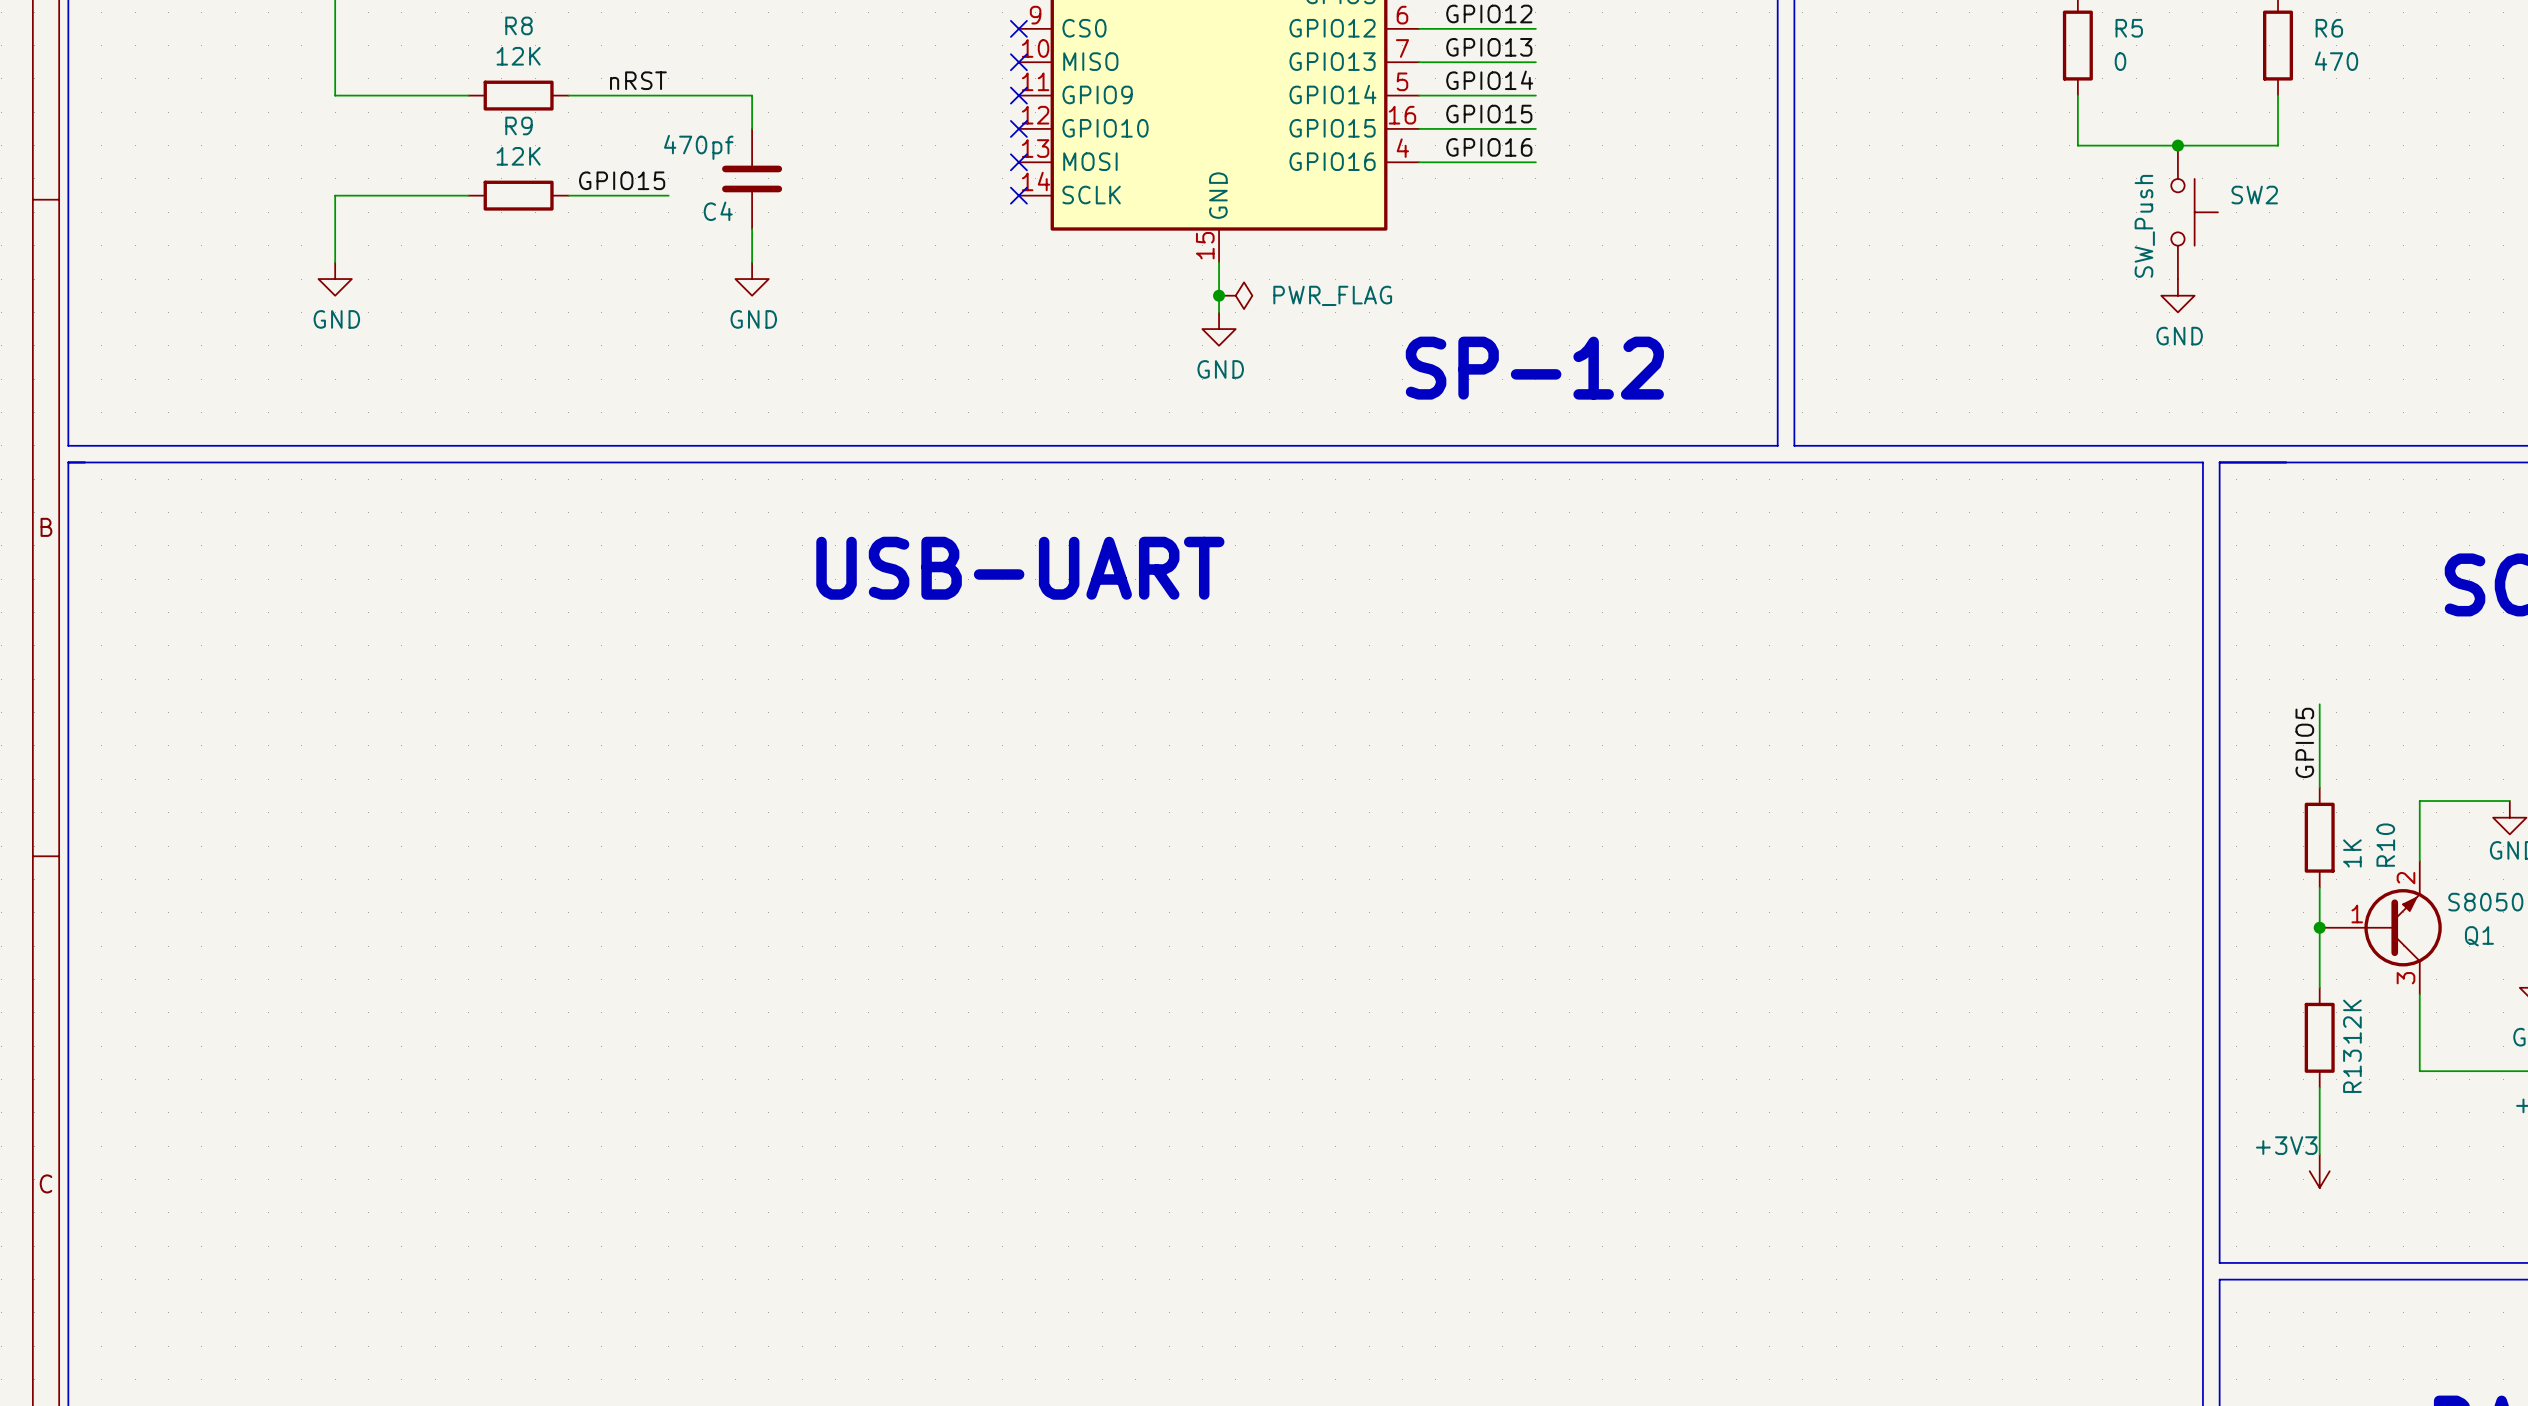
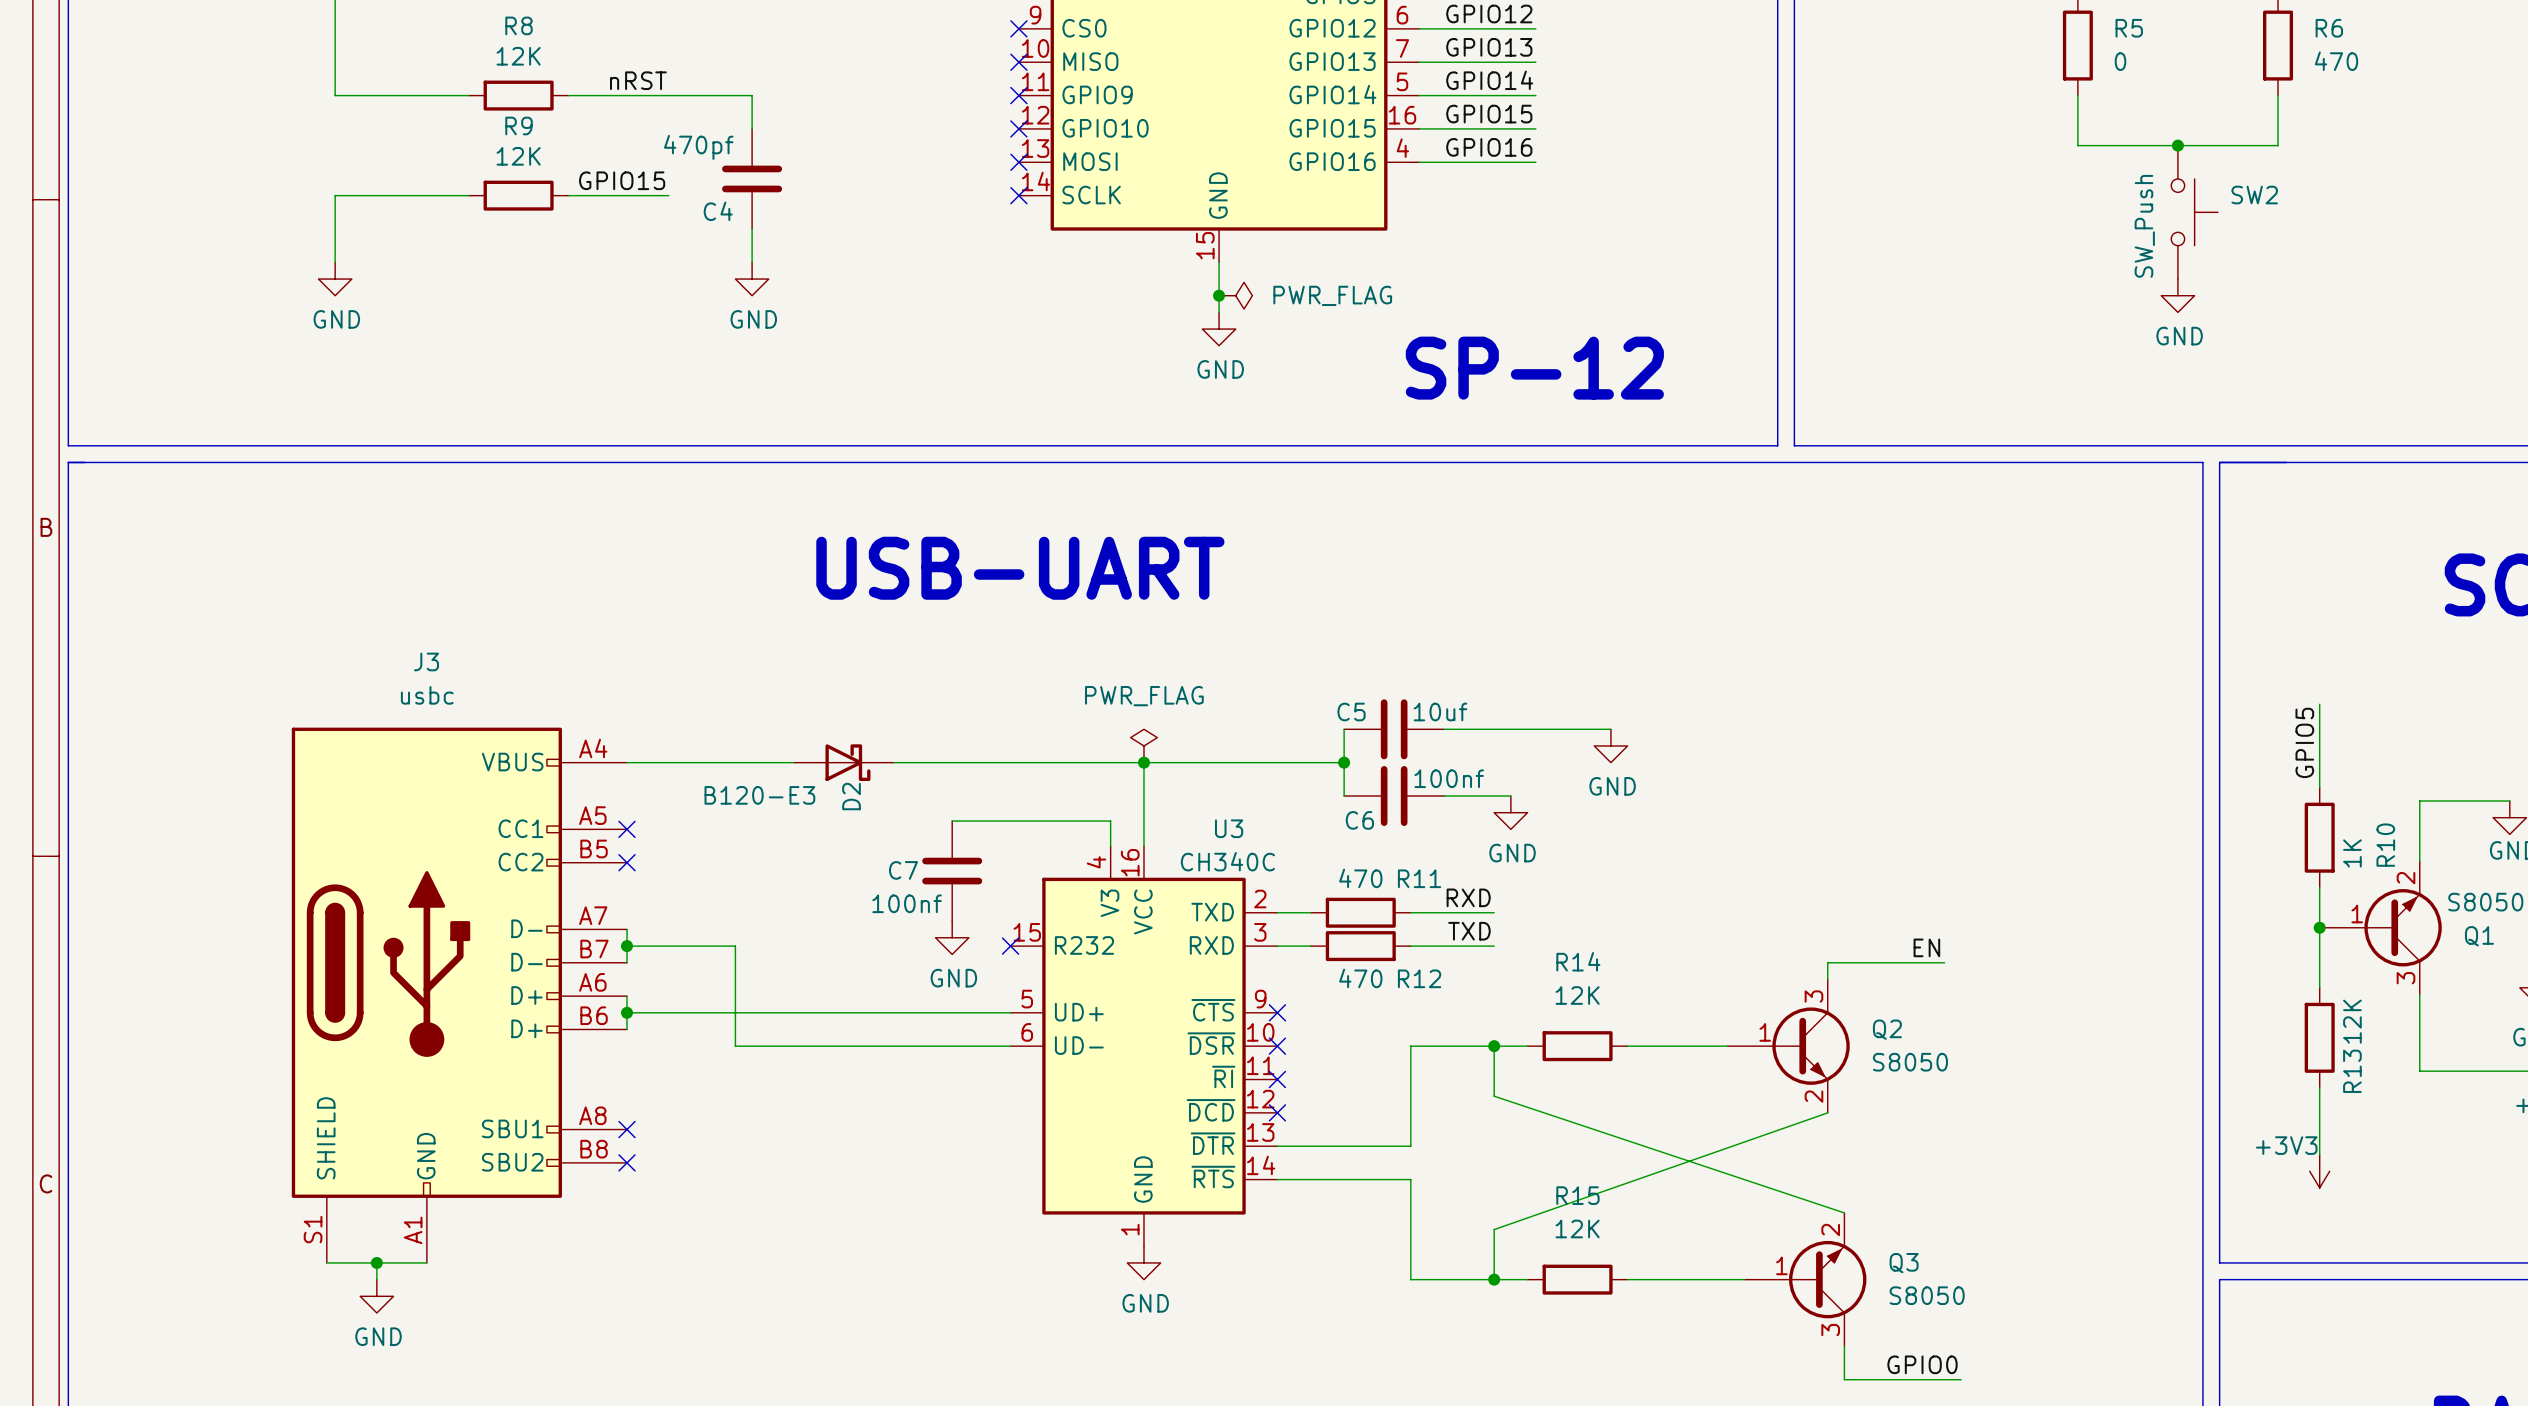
wire: none -> (1344, 729) (1344, 796)
C5: none -> 10uf (1394, 729)
wire: none -> (1444, 729) (1610, 729)
power symbol: none -> PWR_FLAG (1143, 745)
power symbol: none -> GND (1610, 745)
wire: none -> (627, 762) (793, 762)
D2: none -> B120-E3 (843, 762)
wire: none -> (893, 762) (1344, 762)
wire: none -> (1143, 762) (1143, 846)
junction: none -> (1143, 762)
junction: none -> (1344, 762)
C6: none -> 100nf (1394, 796)
wire: none -> (1444, 796) (1510, 796)
power symbol: none -> GND (1510, 812)
wire: none -> (952, 821) (1110, 821) (1110, 846)
no-connect mark: none -> (627, 829)
no-connect mark: none -> (627, 862)
C7: none -> 100nf (952, 871)
label: none -> RXD (1468, 897)
wire: none -> (1277, 912) (1310, 912)
R11: none -> 470 (1360, 912)
wire: none -> (1410, 912) (1494, 912)
wire: none -> (627, 929) (627, 962)
label: none -> TXD (1469, 931)
power symbol: none -> GND (952, 937)
wire: none -> (627, 946) (735, 946) (735, 1046) (1010, 1046)
junction: none -> (627, 946)
no-connect mark: none -> (1010, 946)
wire: none -> (1277, 946) (1310, 946)
R12: none -> 470 (1360, 946)
wire: none -> (1410, 946) (1494, 946)
label: none -> EN (1926, 947)
wire: none -> (1944, 962) (1827, 962) (1827, 979)
J3: none -> usbc (459, 995)
wire: none -> (627, 996) (627, 1029)
wire: none -> (627, 1012) (1010, 1012)
junction: none -> (627, 1012)
no-connect mark: none -> (1277, 1012)
U3: none -> CH340C (1143, 1046)
no-connect mark: none -> (1277, 1046)
wire: none -> (1494, 1046) (1494, 1096) (1844, 1212)
junction: none -> (1494, 1046)
wire: none -> (1527, 1046) (1410, 1046) (1410, 1146) (1277, 1146)
R14: none -> 12K (1577, 1046)
wire: none -> (1627, 1046) (1727, 1046)
Q2: none -> S8050 (1788, 1046)
no-connect mark: none -> (1277, 1079)
no-connect mark: none -> (1277, 1112)
wire: none -> (1827, 1112) (1494, 1229) (1494, 1279)
no-connect mark: none -> (627, 1129)
no-connect mark: none -> (627, 1162)
wire: none -> (1277, 1179) (1410, 1179) (1410, 1279) (1527, 1279)
wire: none -> (326, 1262) (426, 1262)
wire: none -> (376, 1262) (376, 1279)
junction: none -> (376, 1262)
power symbol: none -> GND (1143, 1262)
junction: none -> (1494, 1279)
R15: none -> 12K (1577, 1279)
wire: none -> (1627, 1279) (1744, 1279)
Q3: none -> S8050 (1805, 1279)
power symbol: none -> GND (376, 1296)
wire: none -> (1844, 1346) (1844, 1379) (1961, 1379)
label: none -> GPIO0 (1922, 1364)

